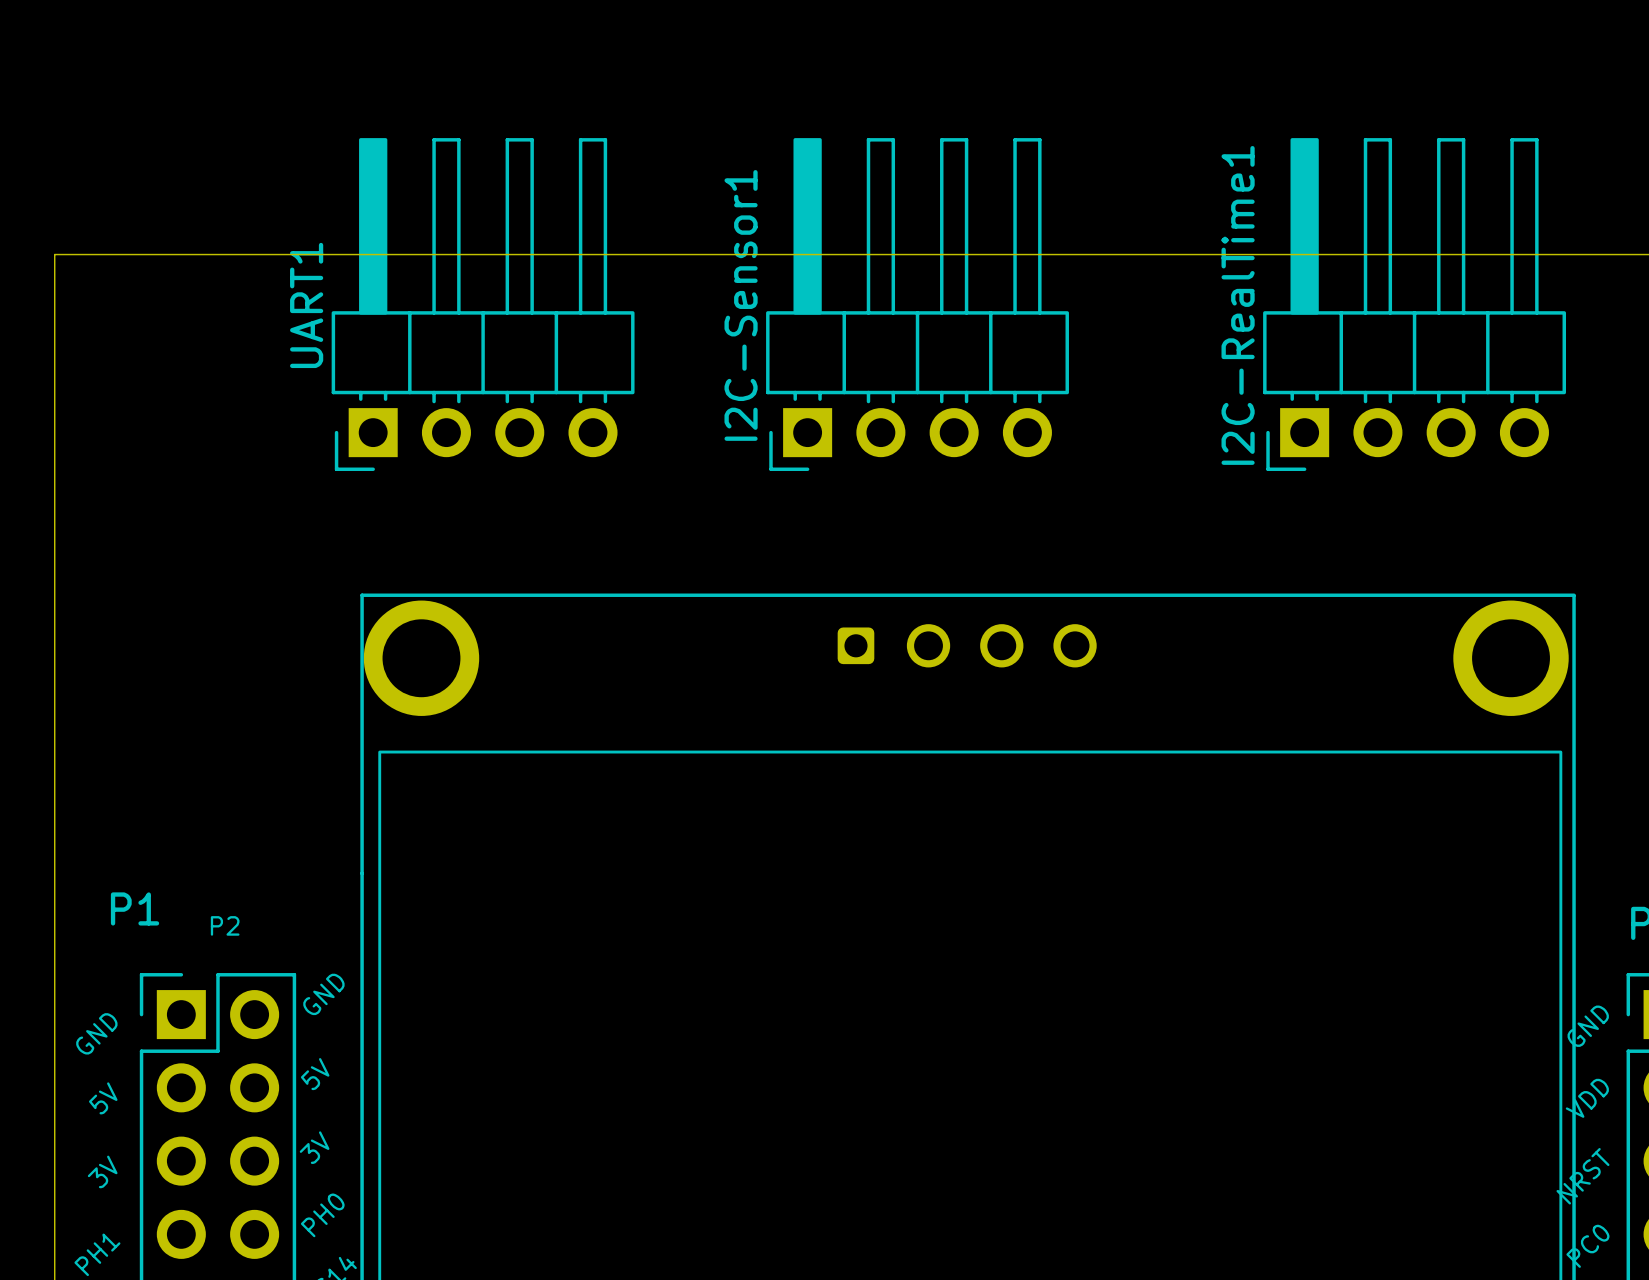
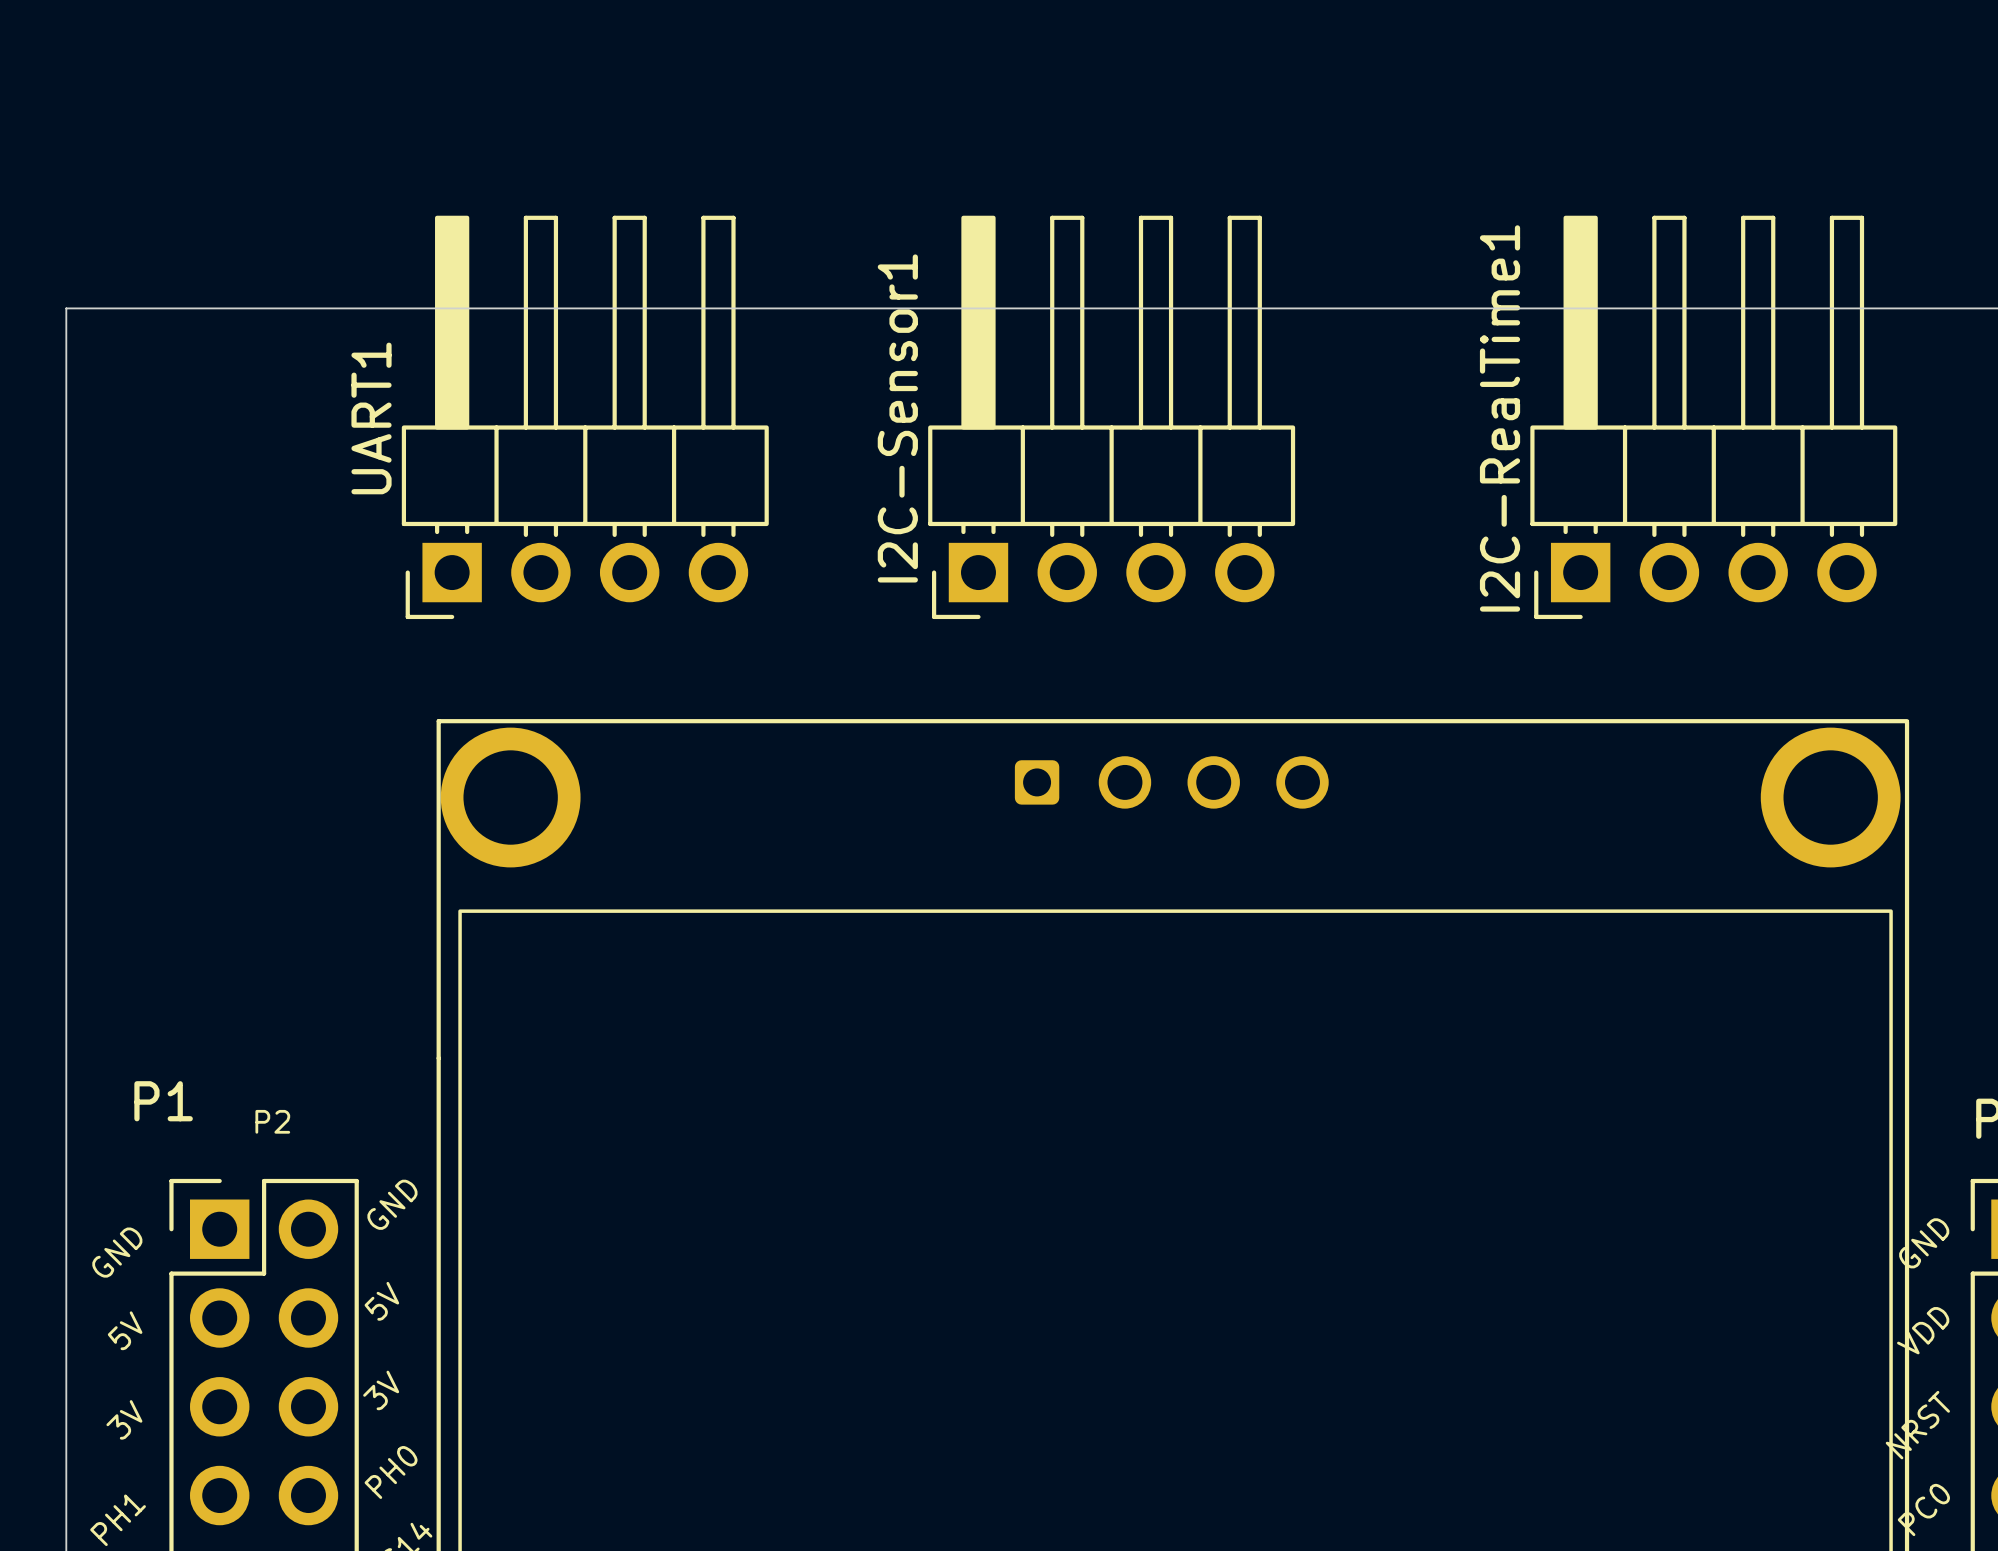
UART1 position: (483, 304) -> (585, 417)
I2C-Sensor1 position: (917, 304) -> (1111, 417)
I2C-RealTime1 position: (1414, 304) -> (1713, 417)

